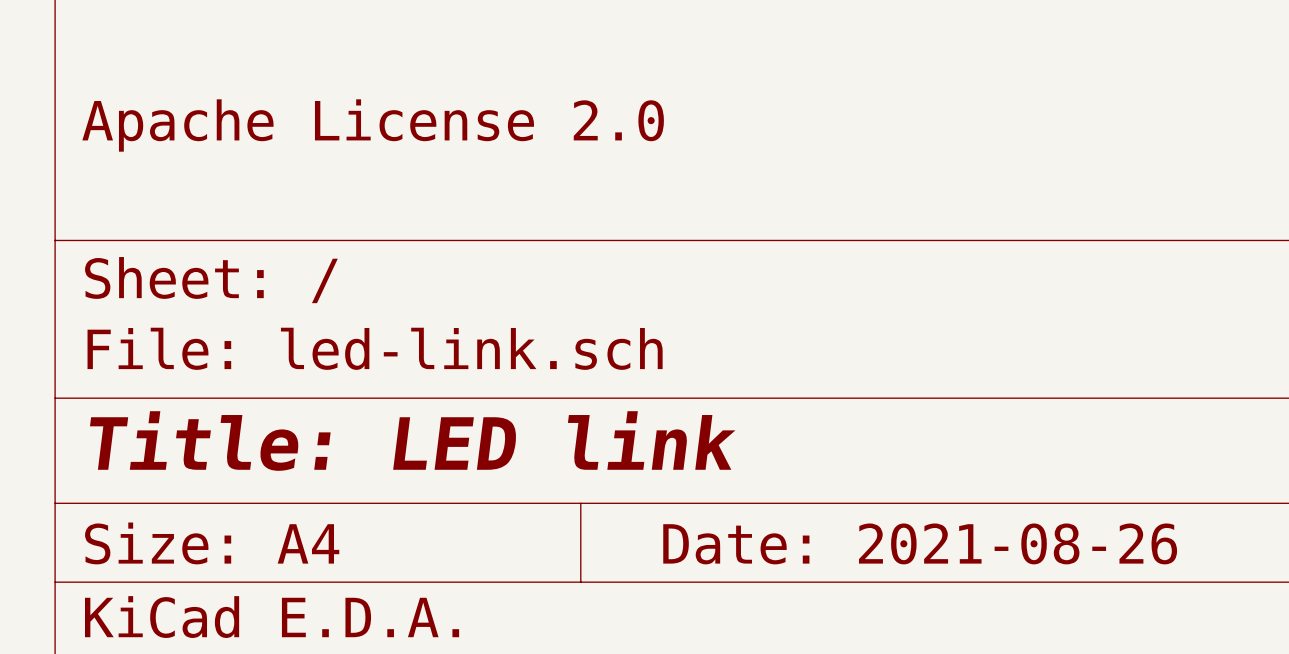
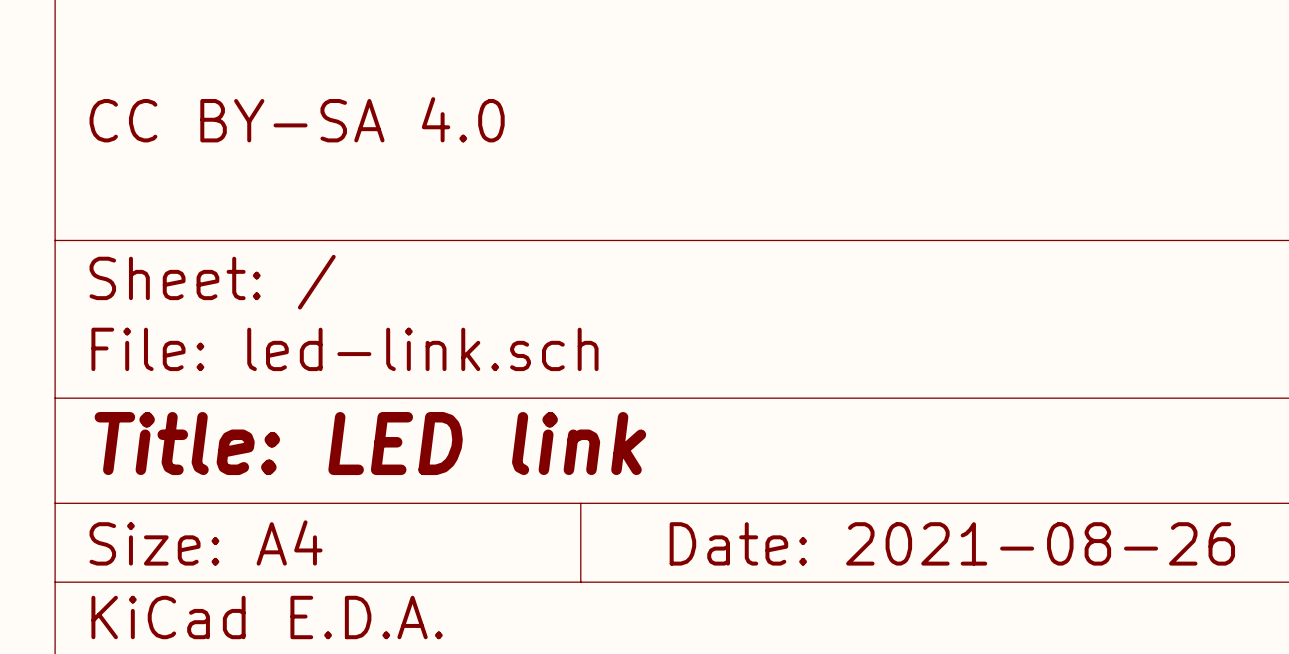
title block: Apache License 2.0 (373, 125) -> CC BY-SA 4.0 (297, 119)

